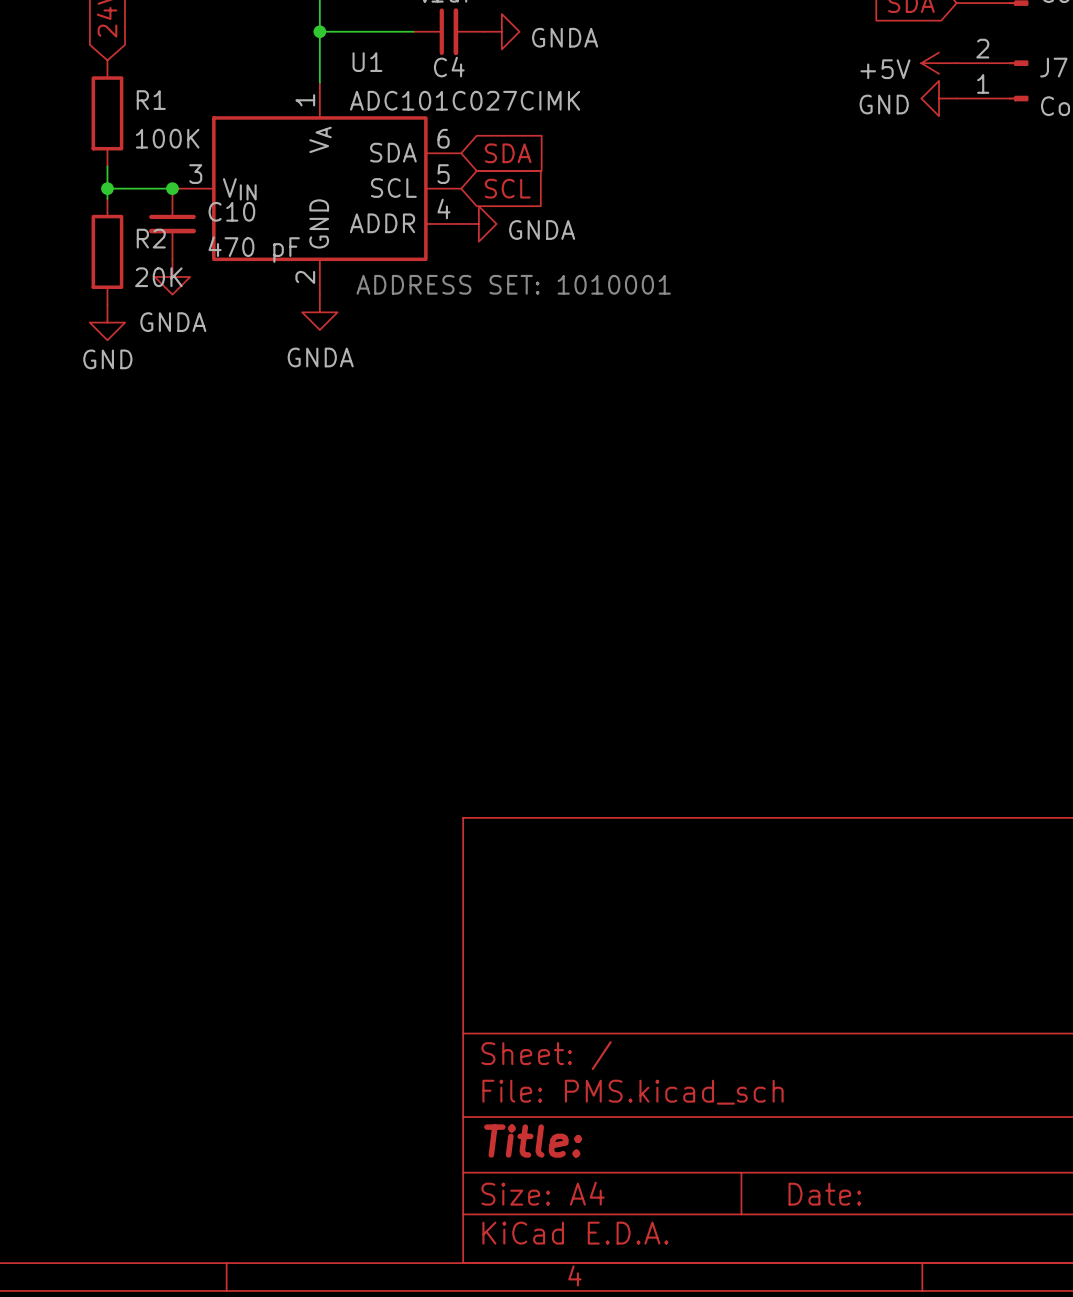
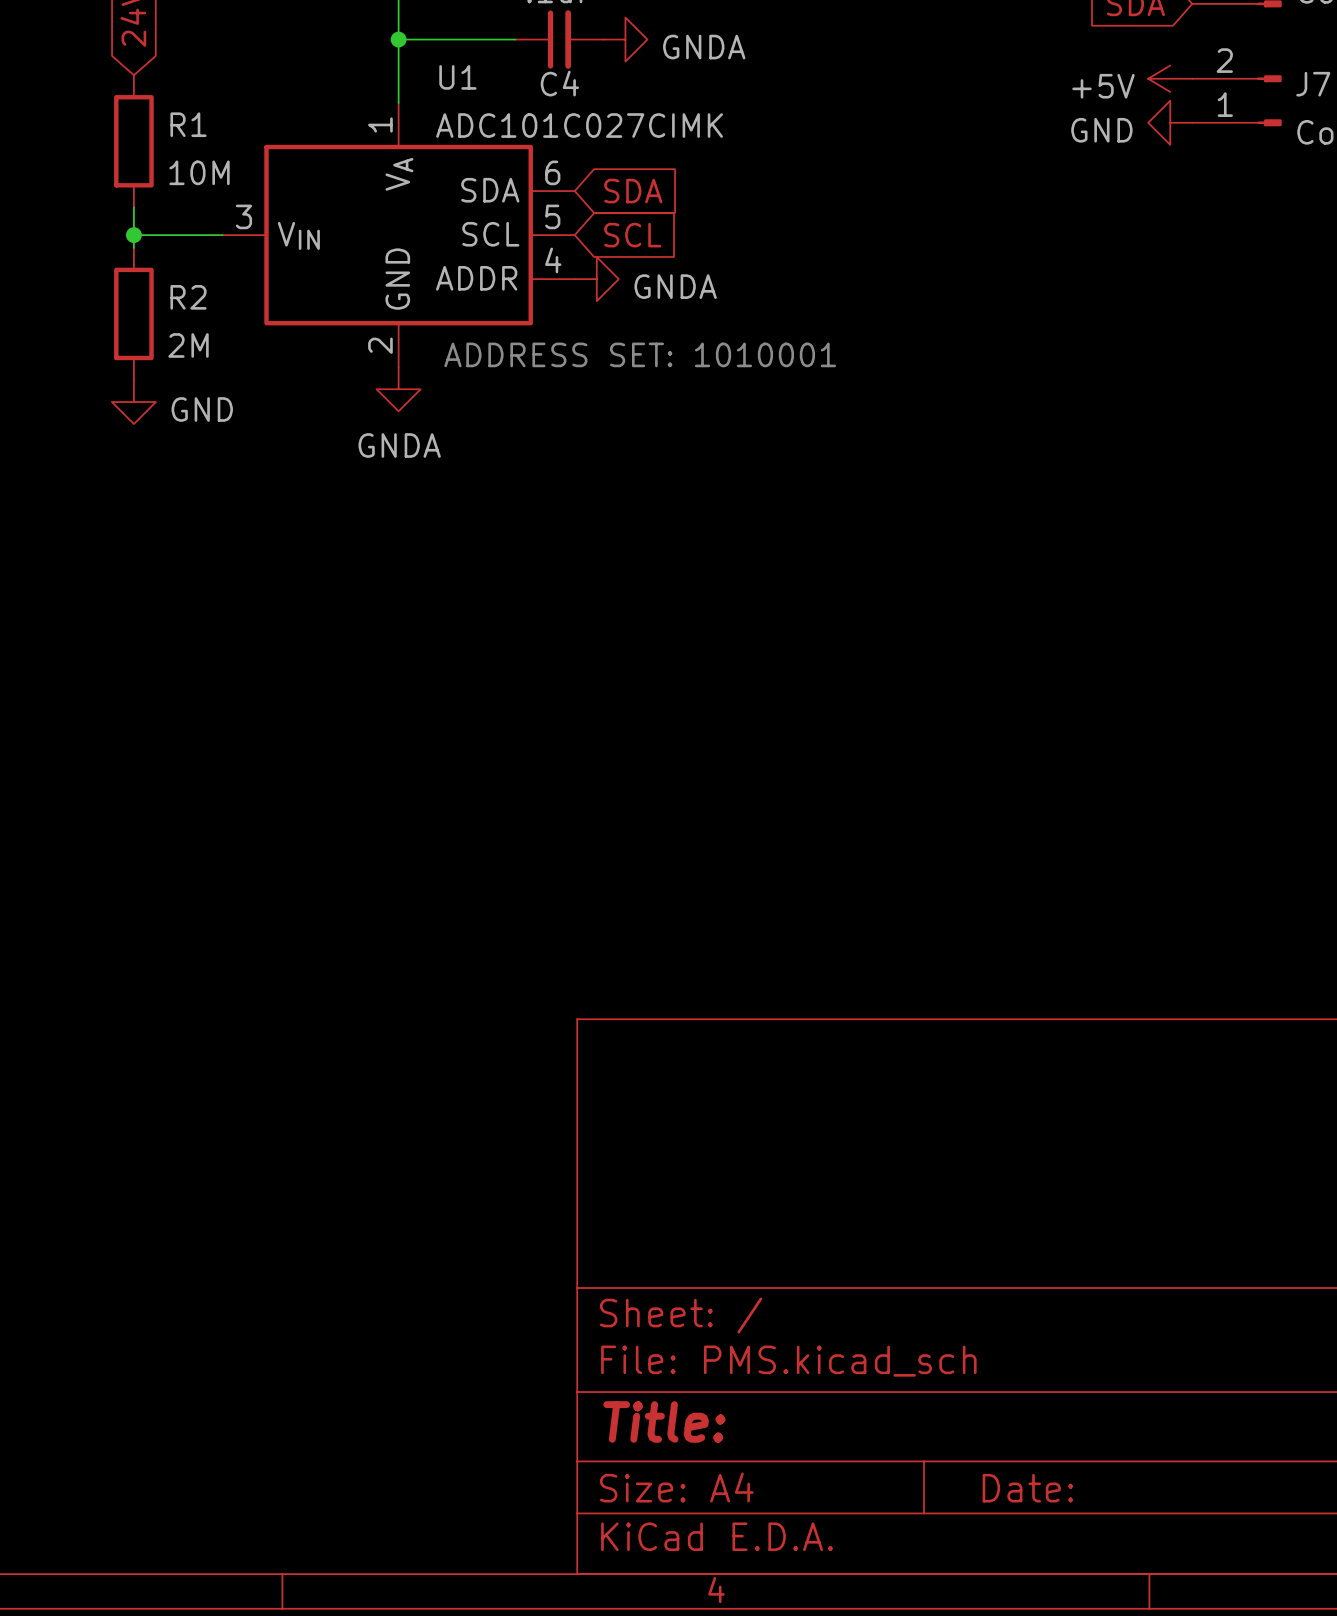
R1 value: 100K (167, 138) -> 10M (199, 172)
junction: (172, 188) -> none
C10: 470 pF (172, 223) -> none
R2 value: 20K (158, 277) -> 2M (188, 345)
power symbol: GNDA (172, 277) -> none
power symbol text position: GND (107, 359) -> GND (202, 409)

